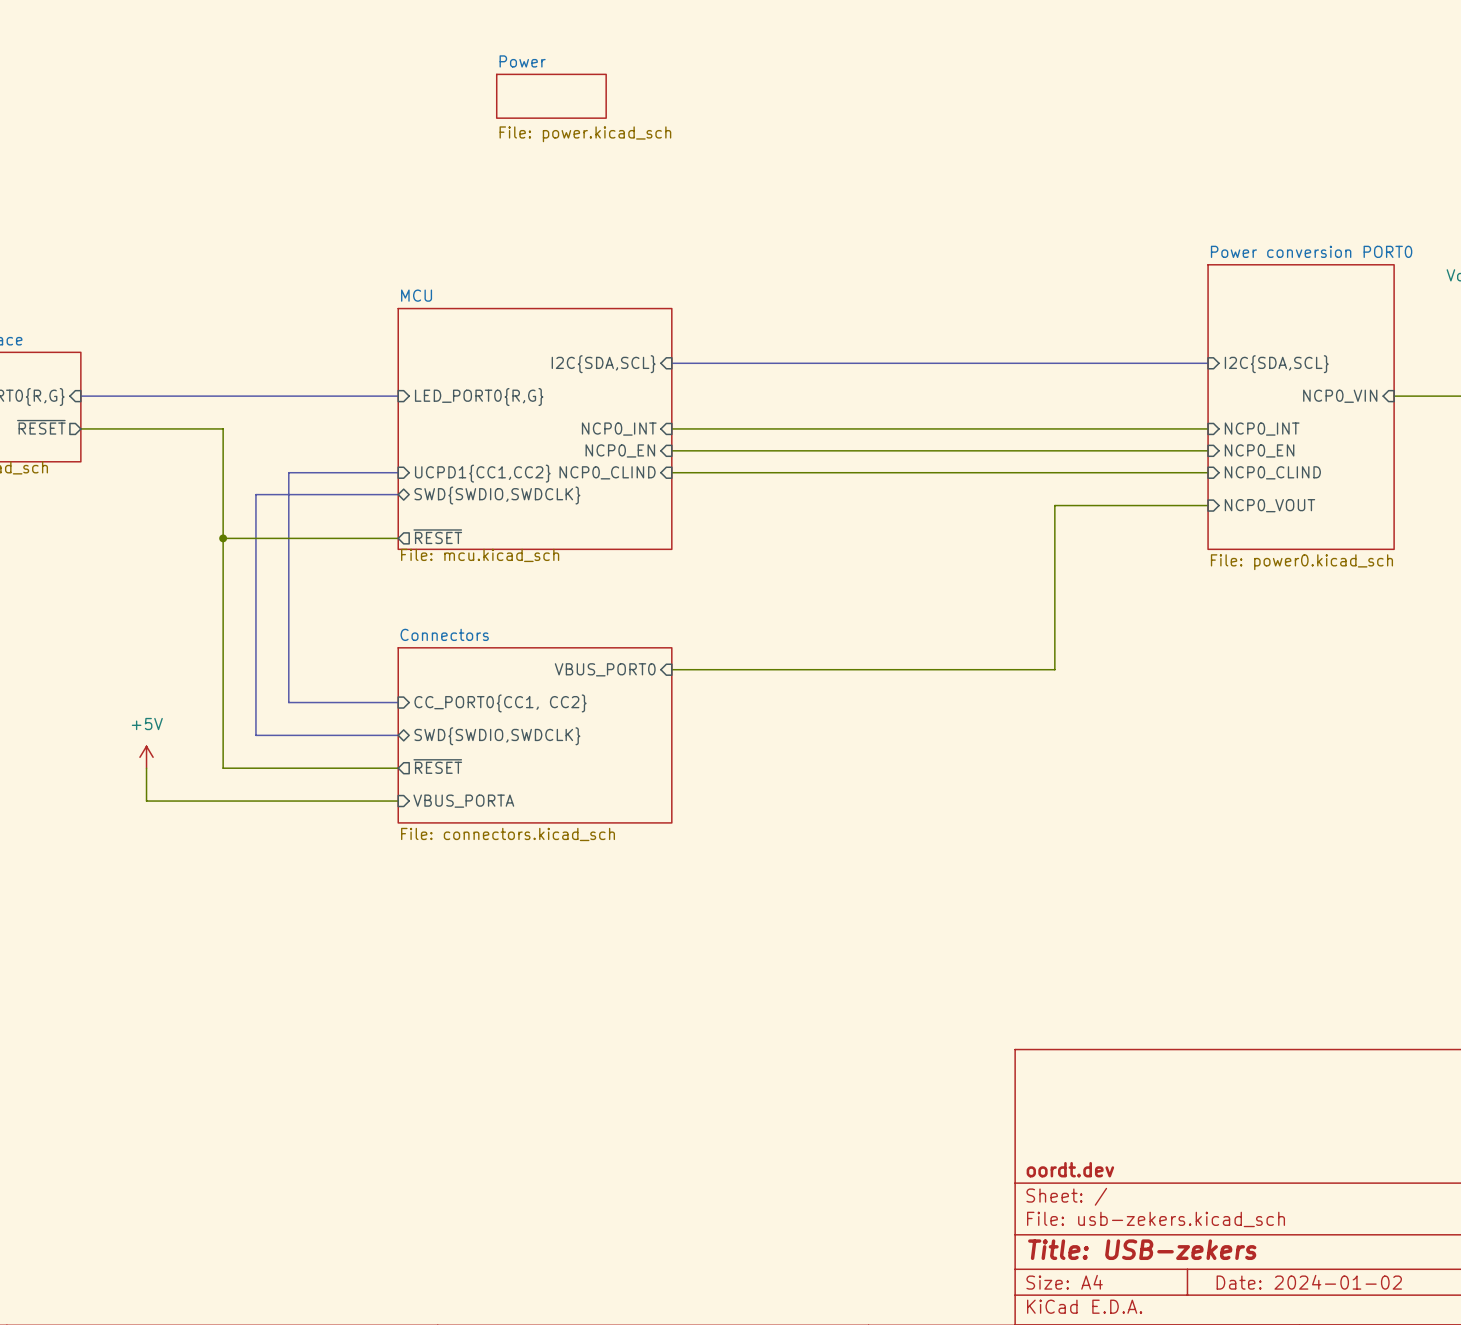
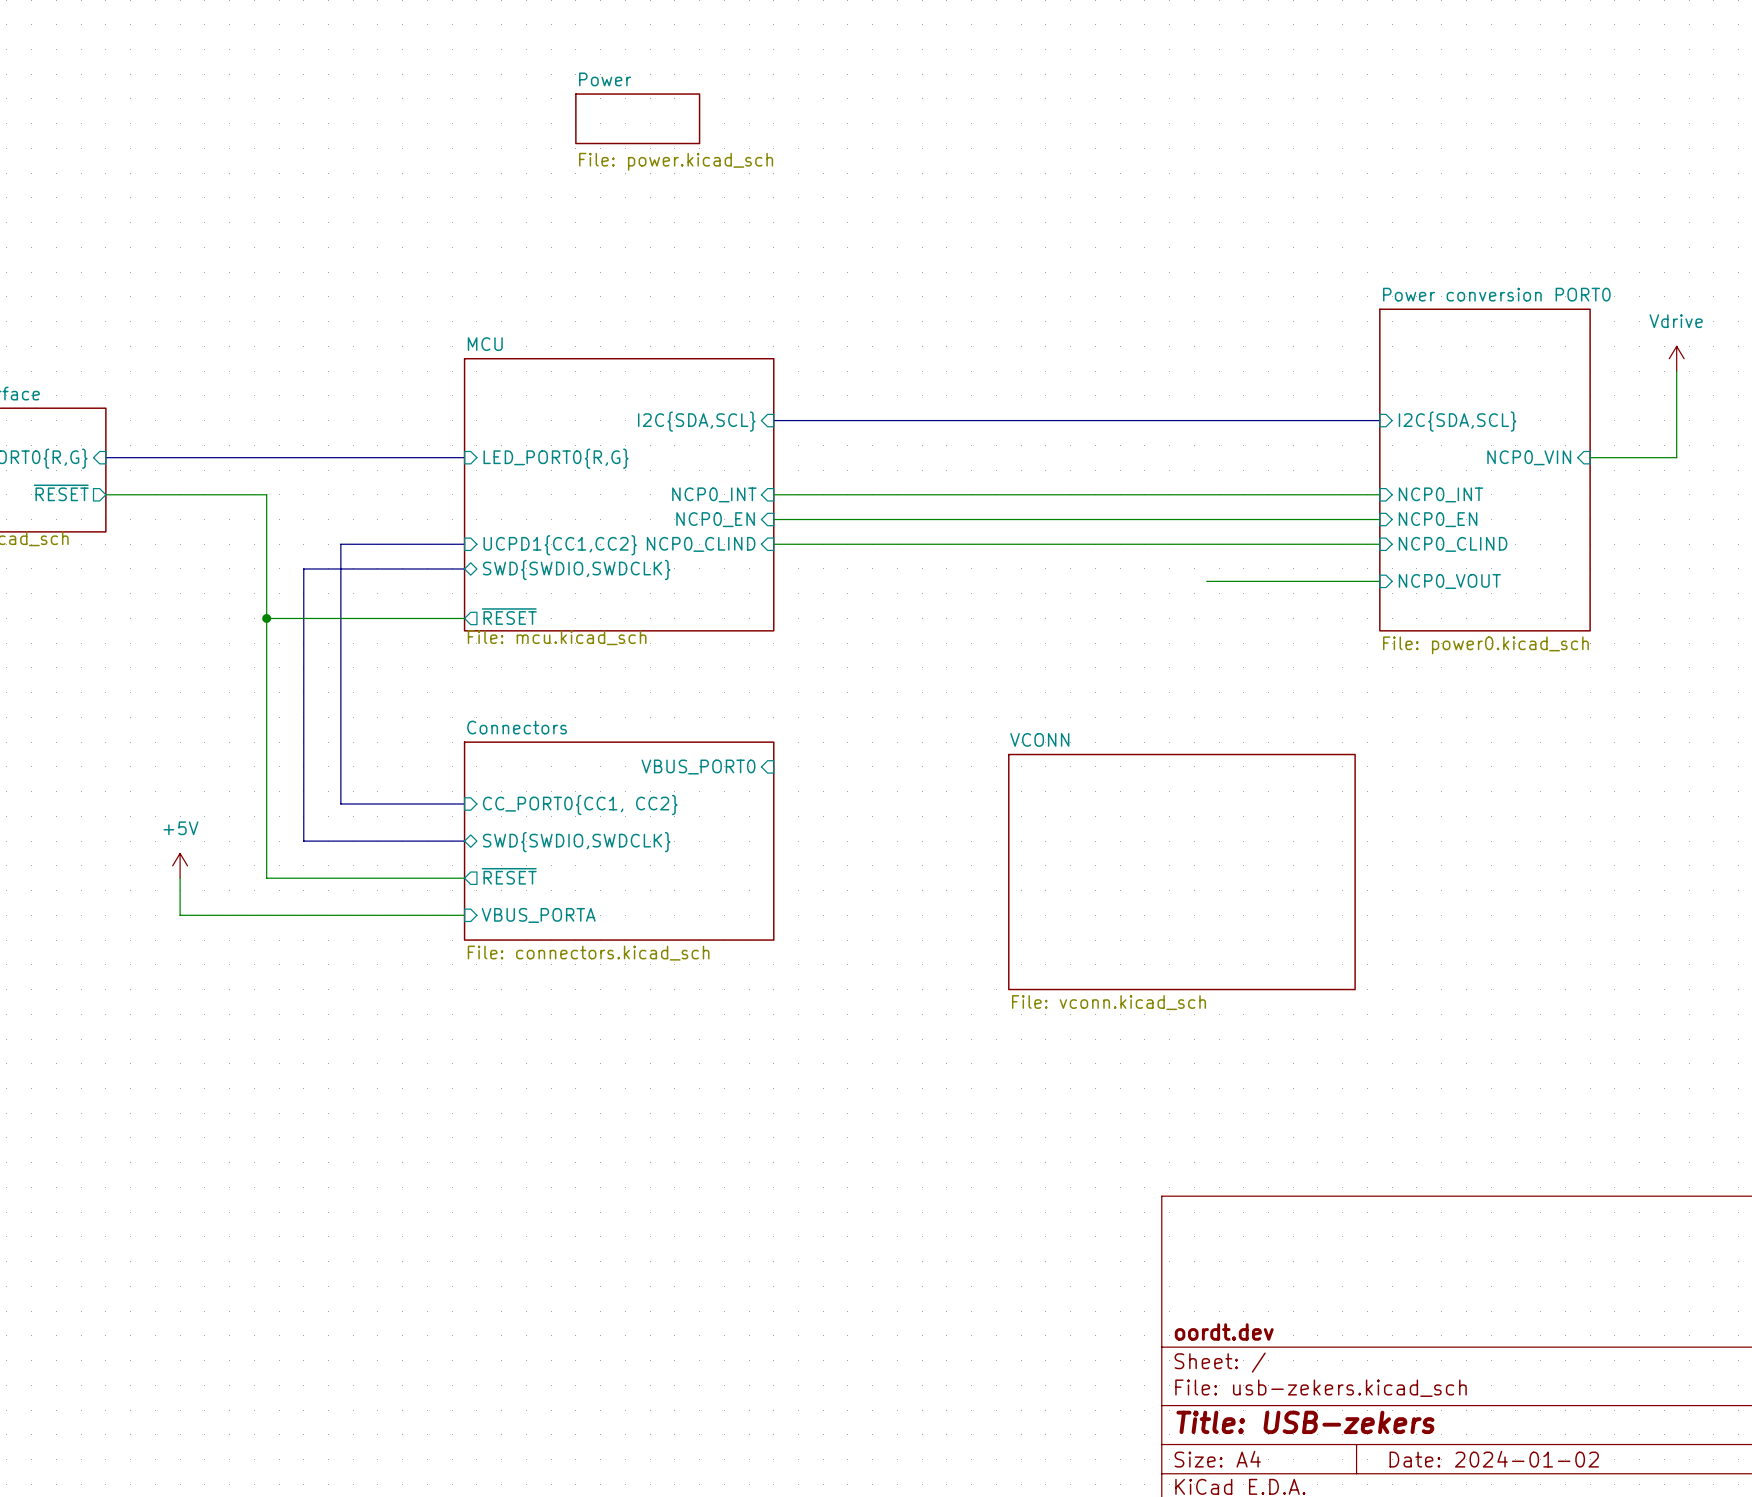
wire: (1054, 505) (1054, 669) (671, 669) -> none
sheet VCONN: none -> File: vconn.kicad_sch (1181, 872)

